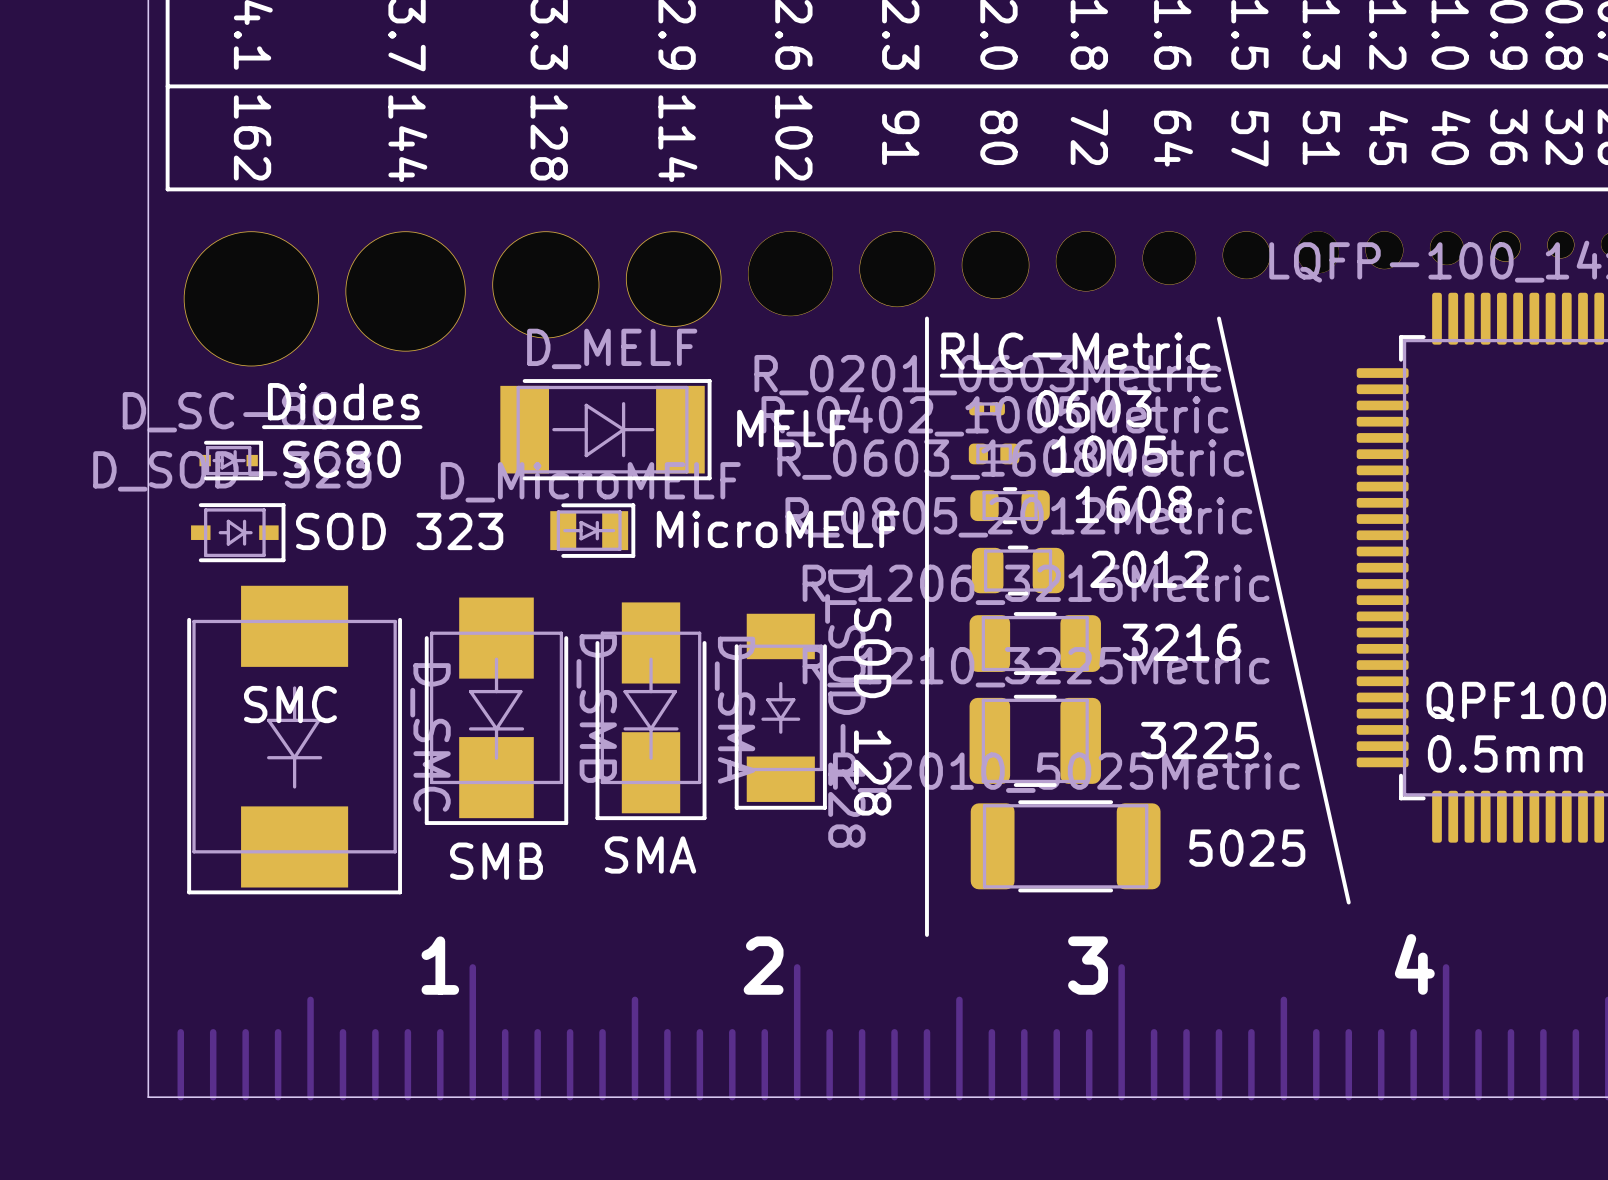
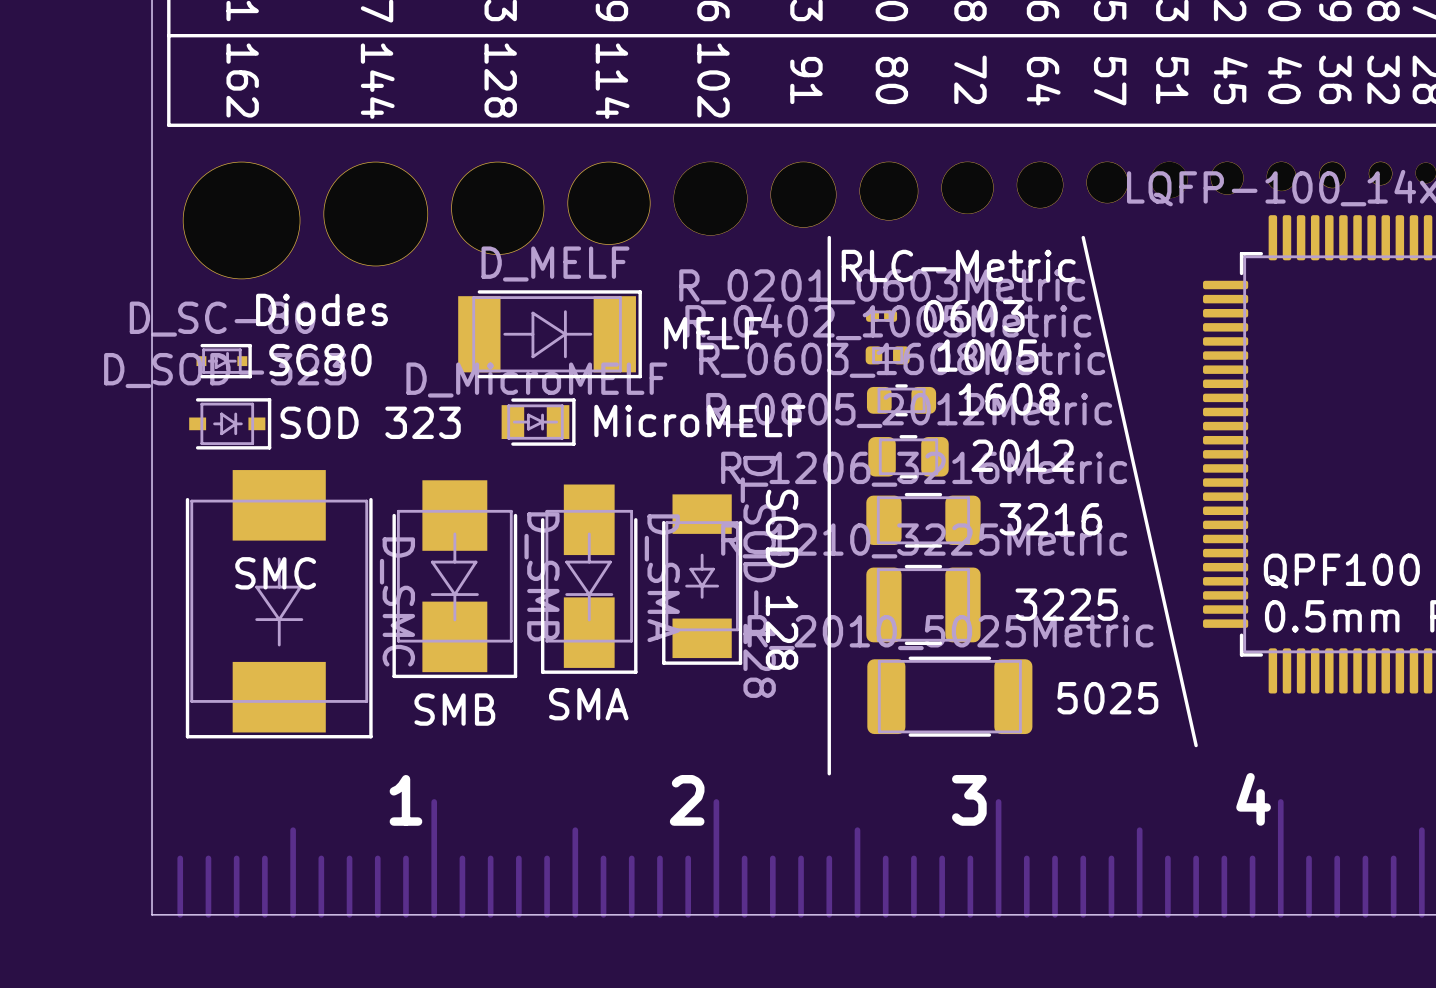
line: (1215, 375) (941, 375) -> none
line: (420, 427) (263, 427) -> none

